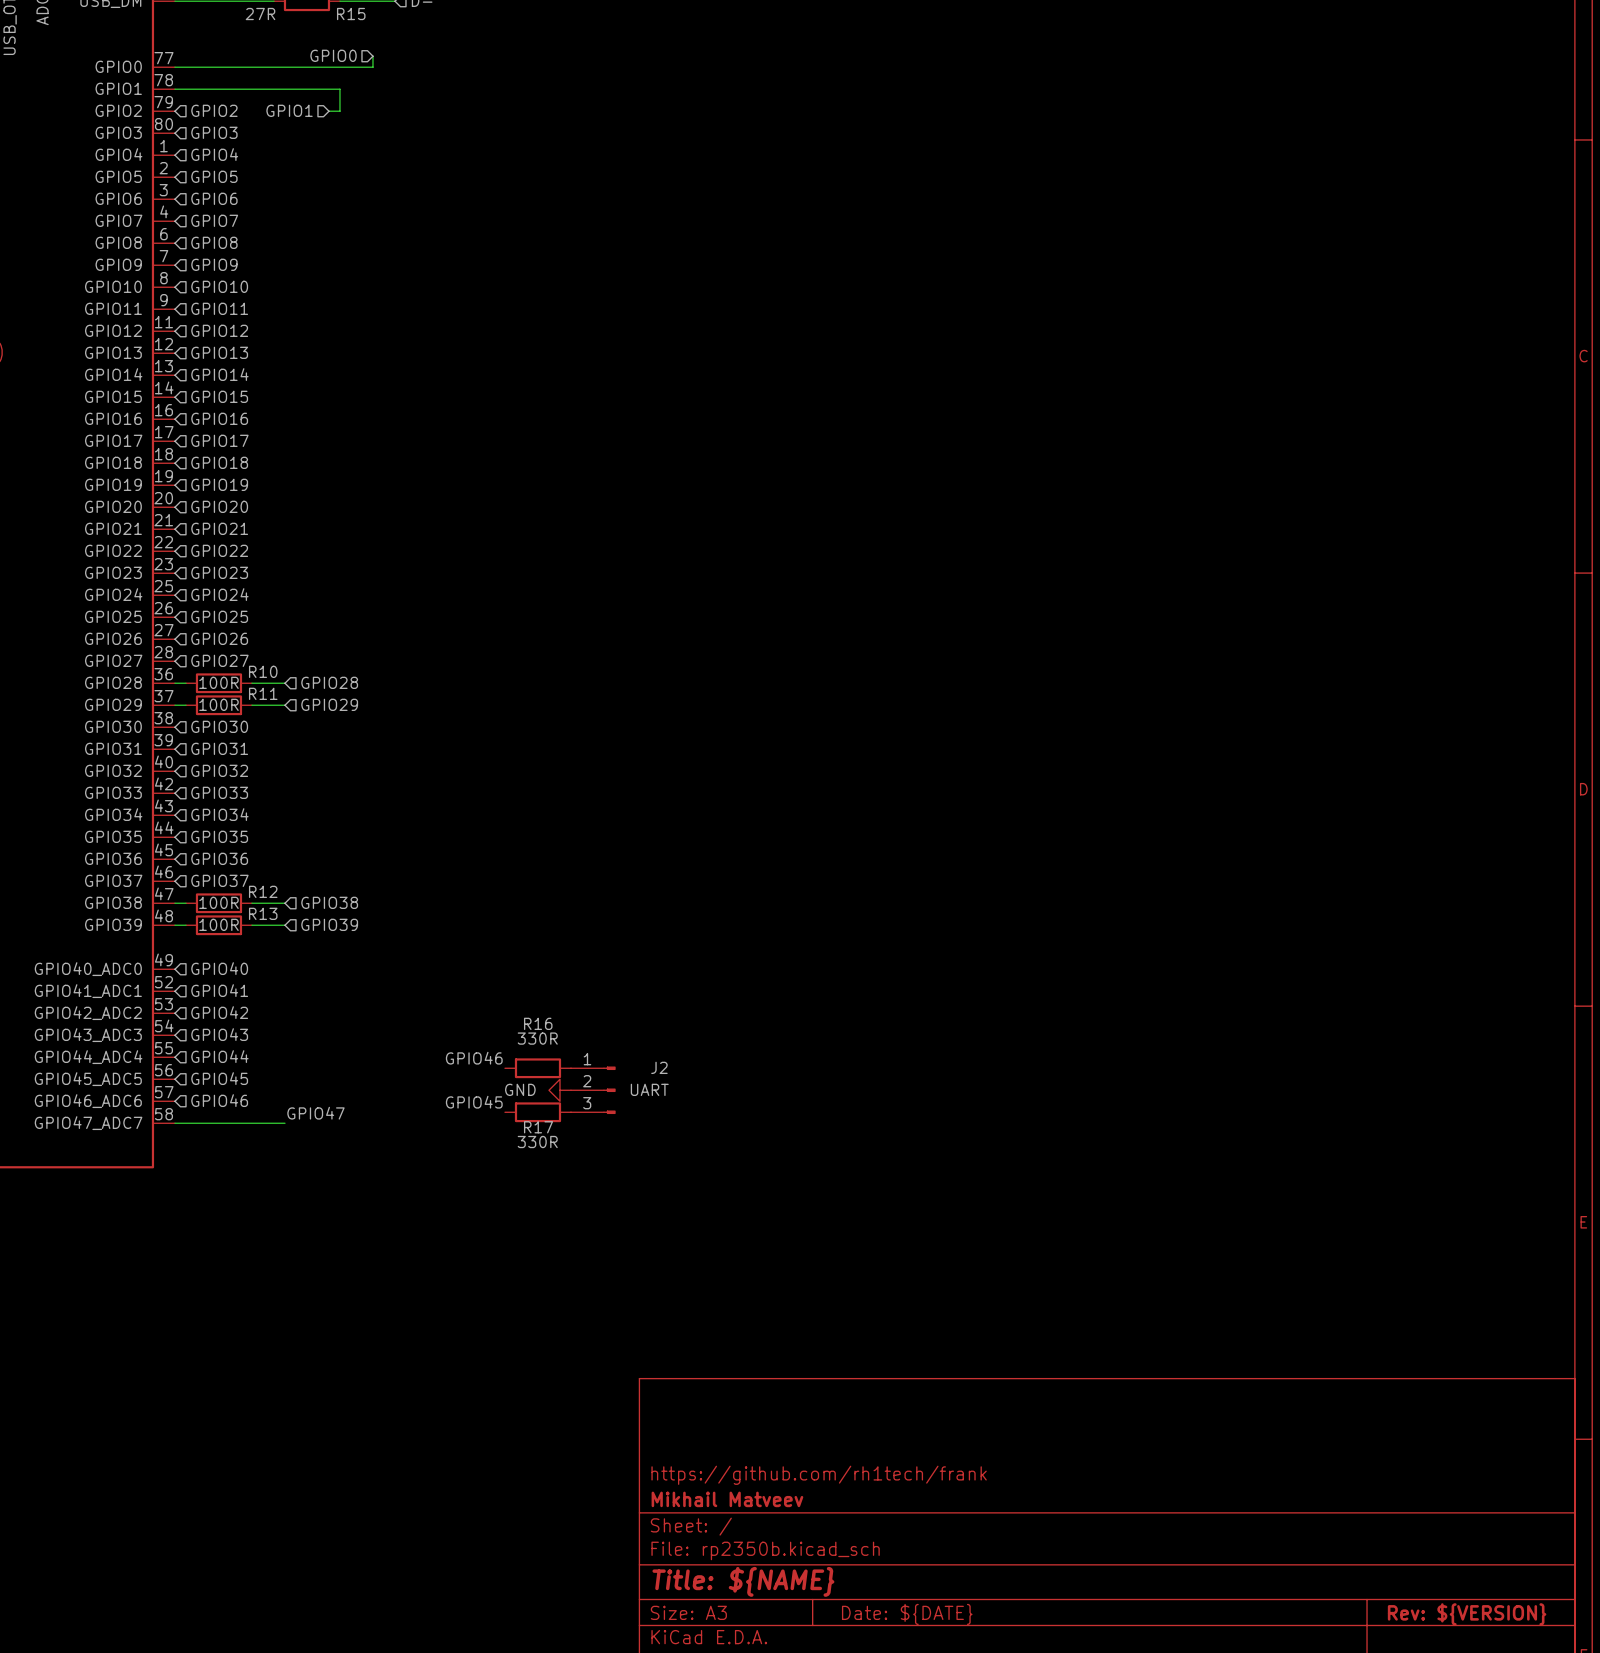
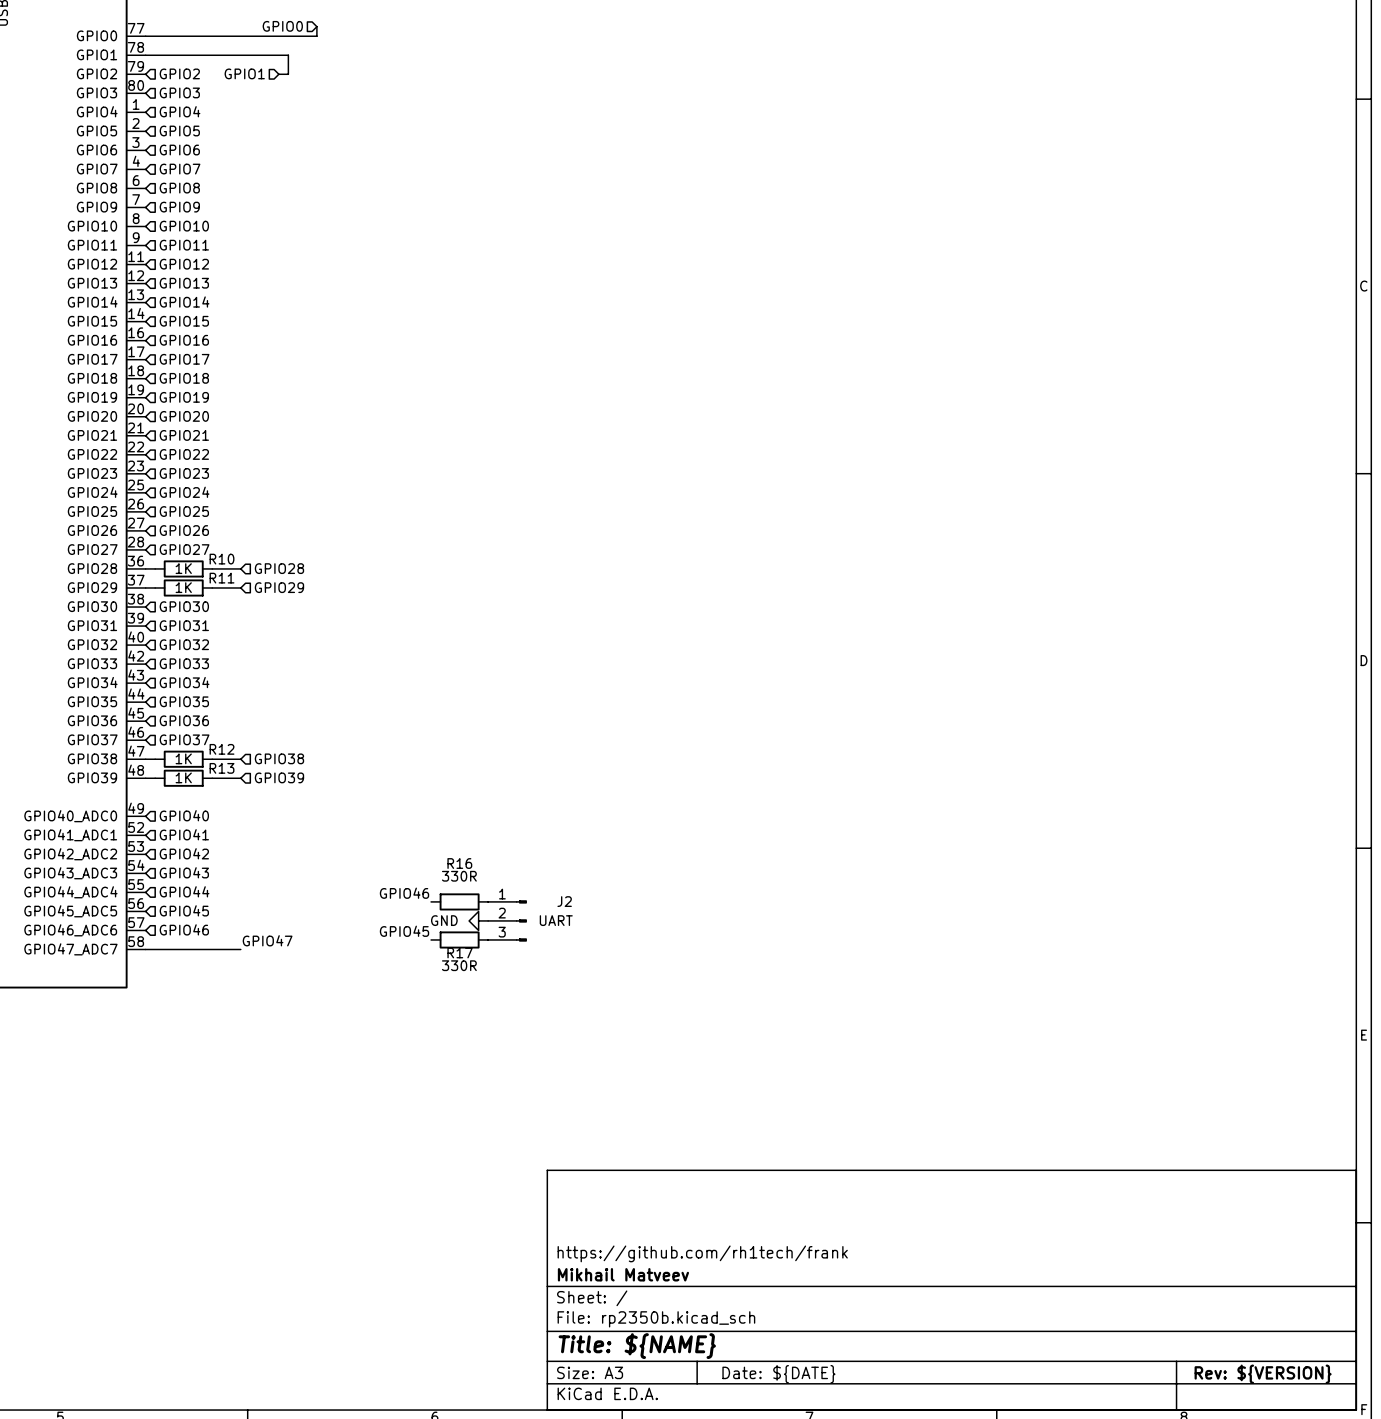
R10 value: 100R (218, 682) -> 1K (183, 568)
R11 value: 100R (218, 704) -> 1K (183, 587)
R12 value: 100R (218, 902) -> 1K (183, 758)
R13 value: 100R (218, 924) -> 1K (183, 777)

